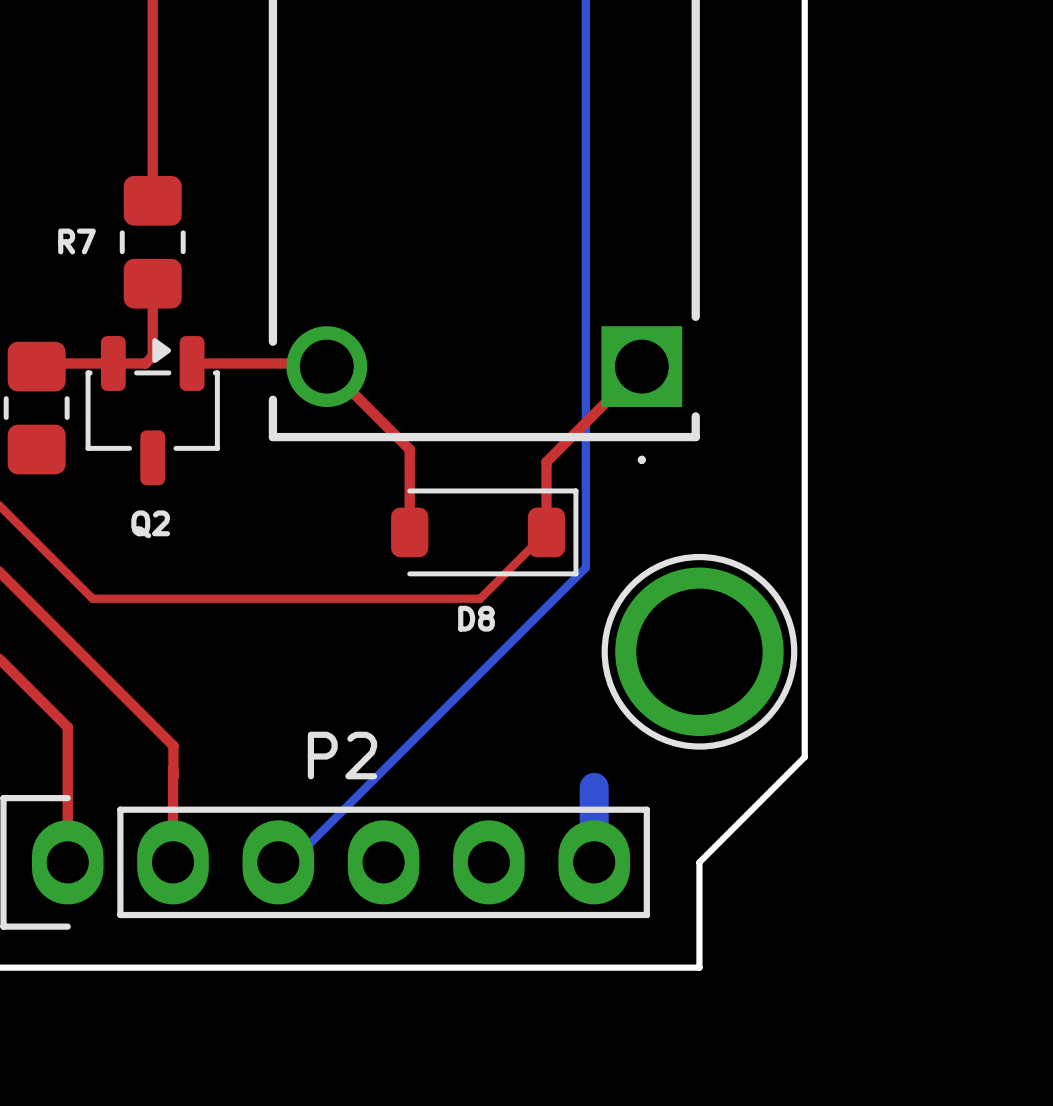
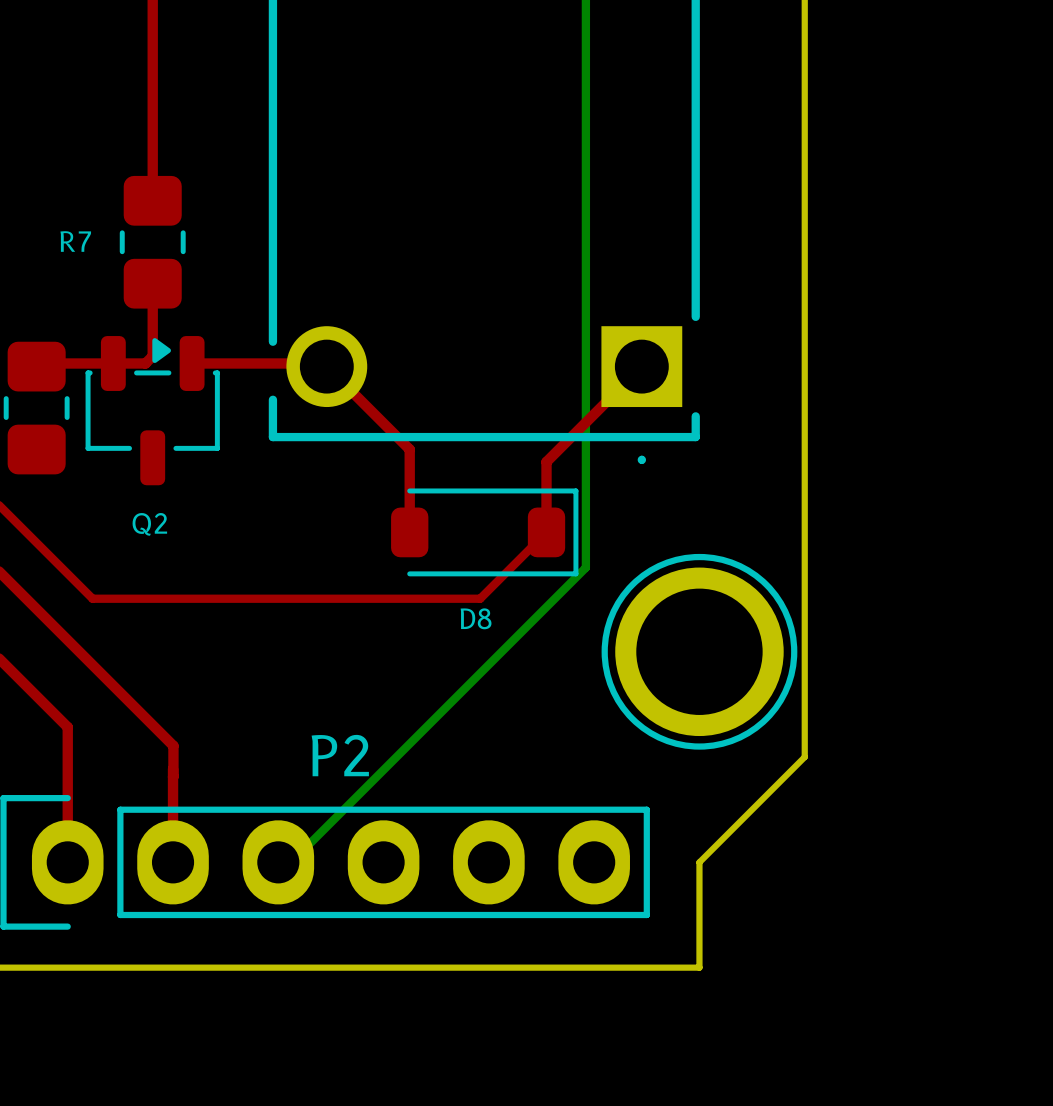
bottom track: (594, 787) (594, 862) -> none

